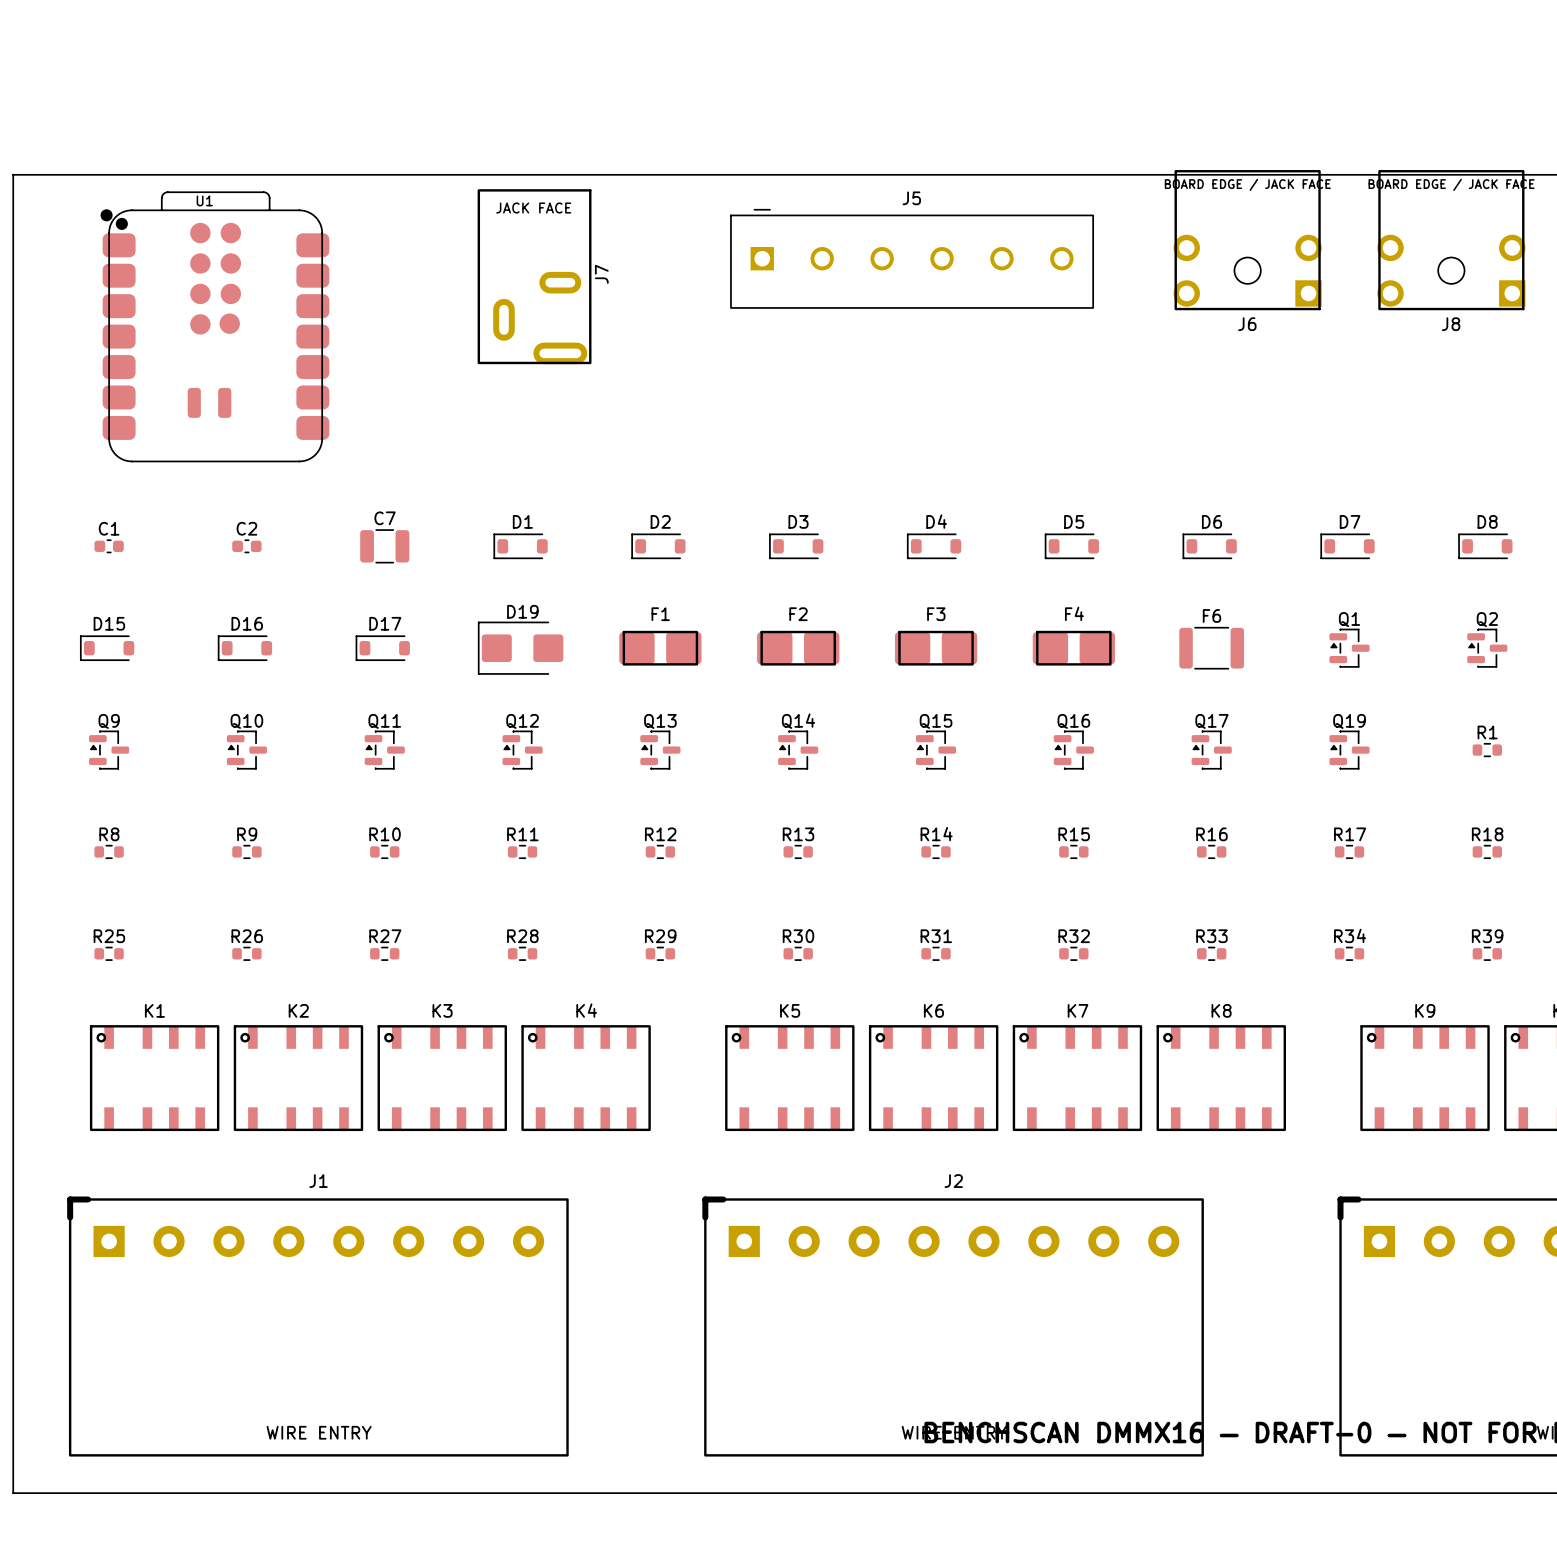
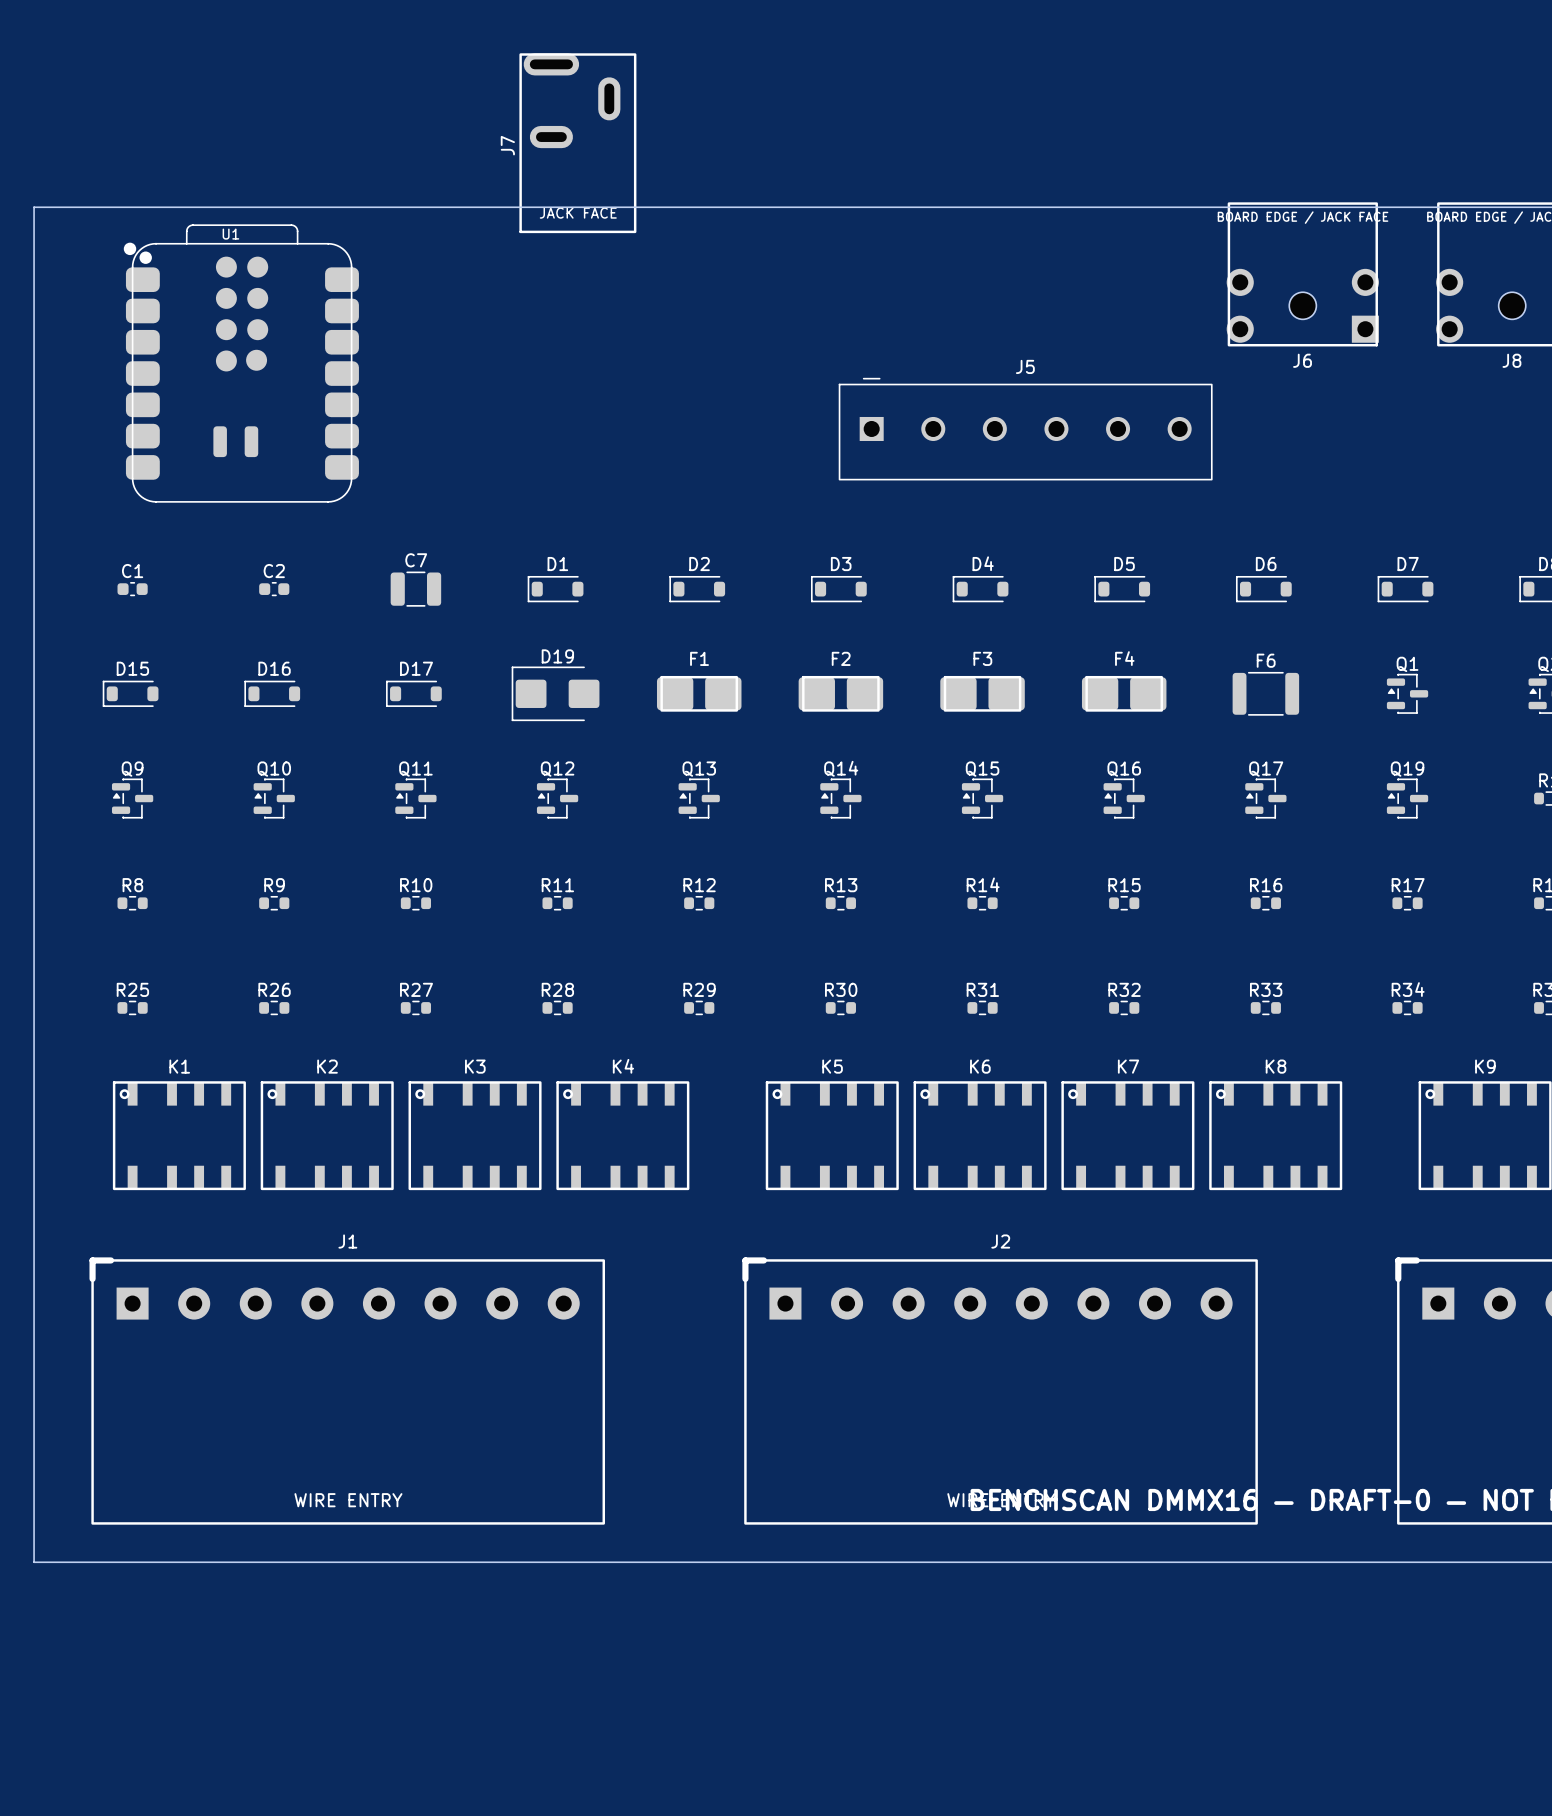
J5 position: (912, 258) -> (1025, 429)
J7 rotation: 0° (534, 276) -> 180° (577, 143)
J7 position: (534, 276) -> (577, 143)

